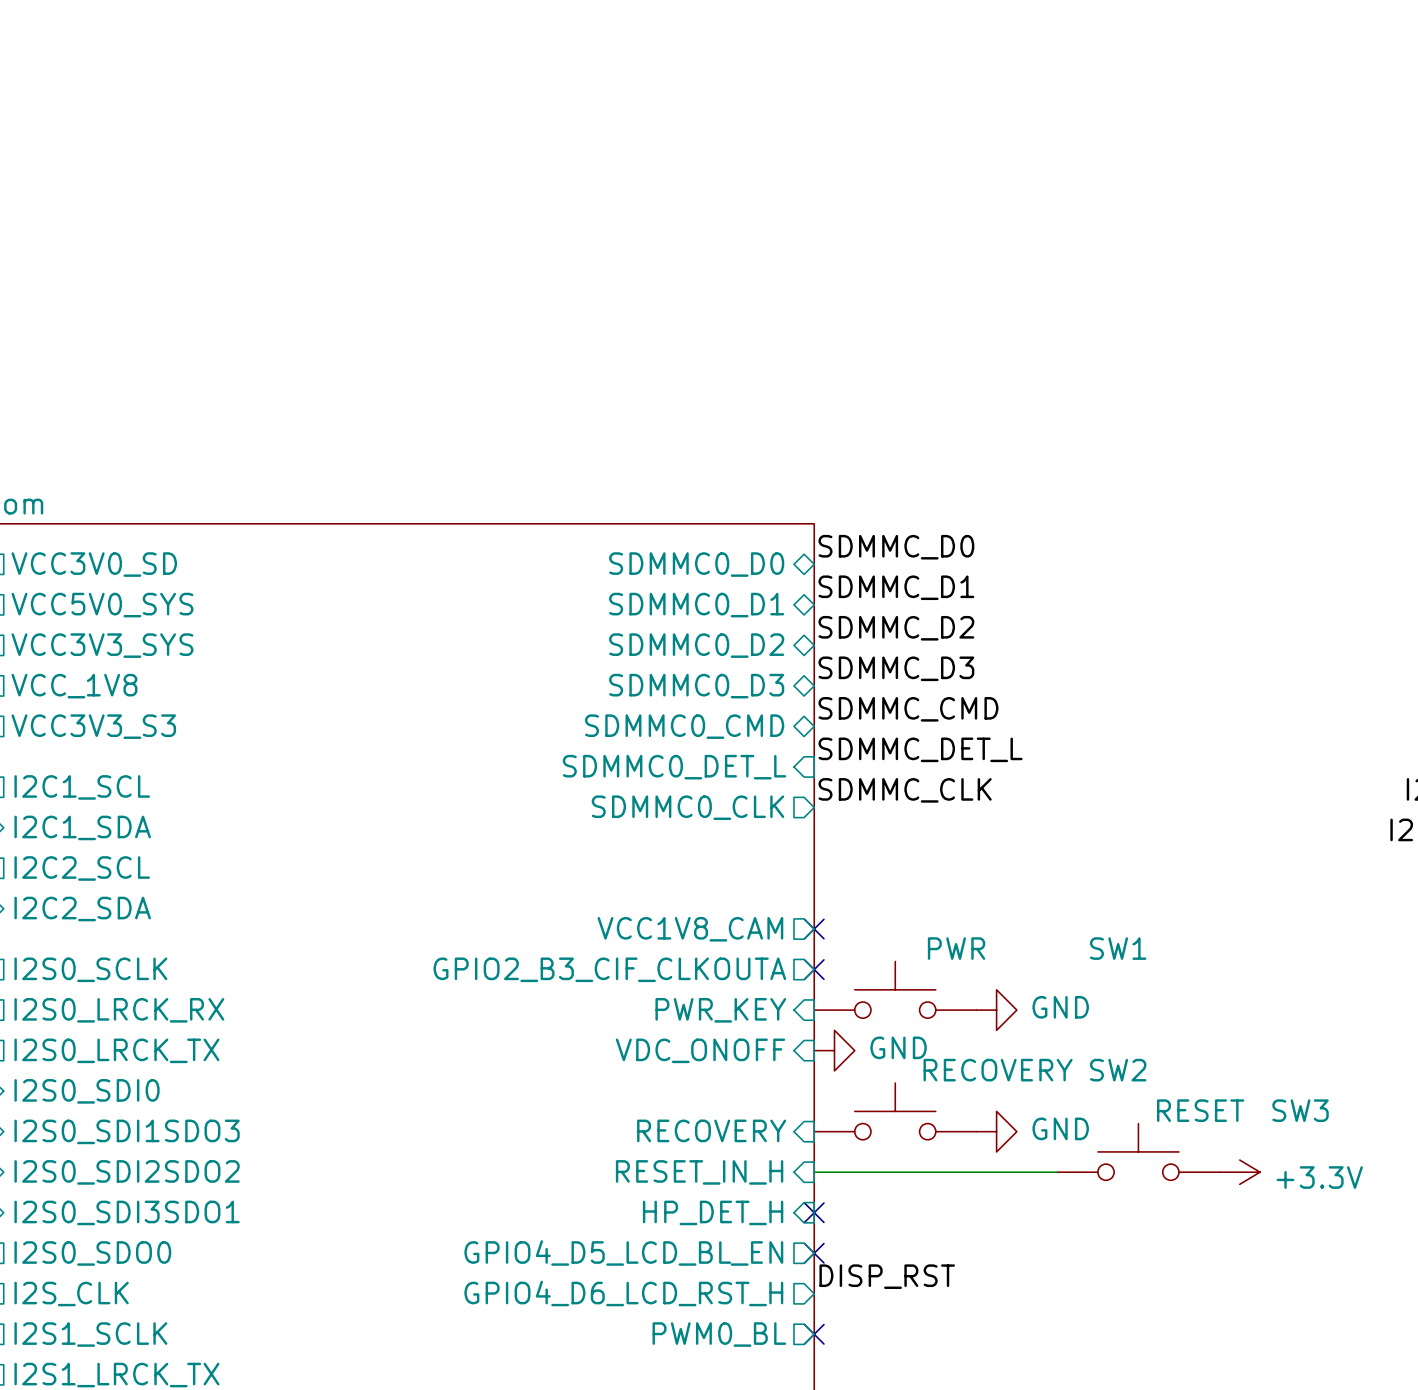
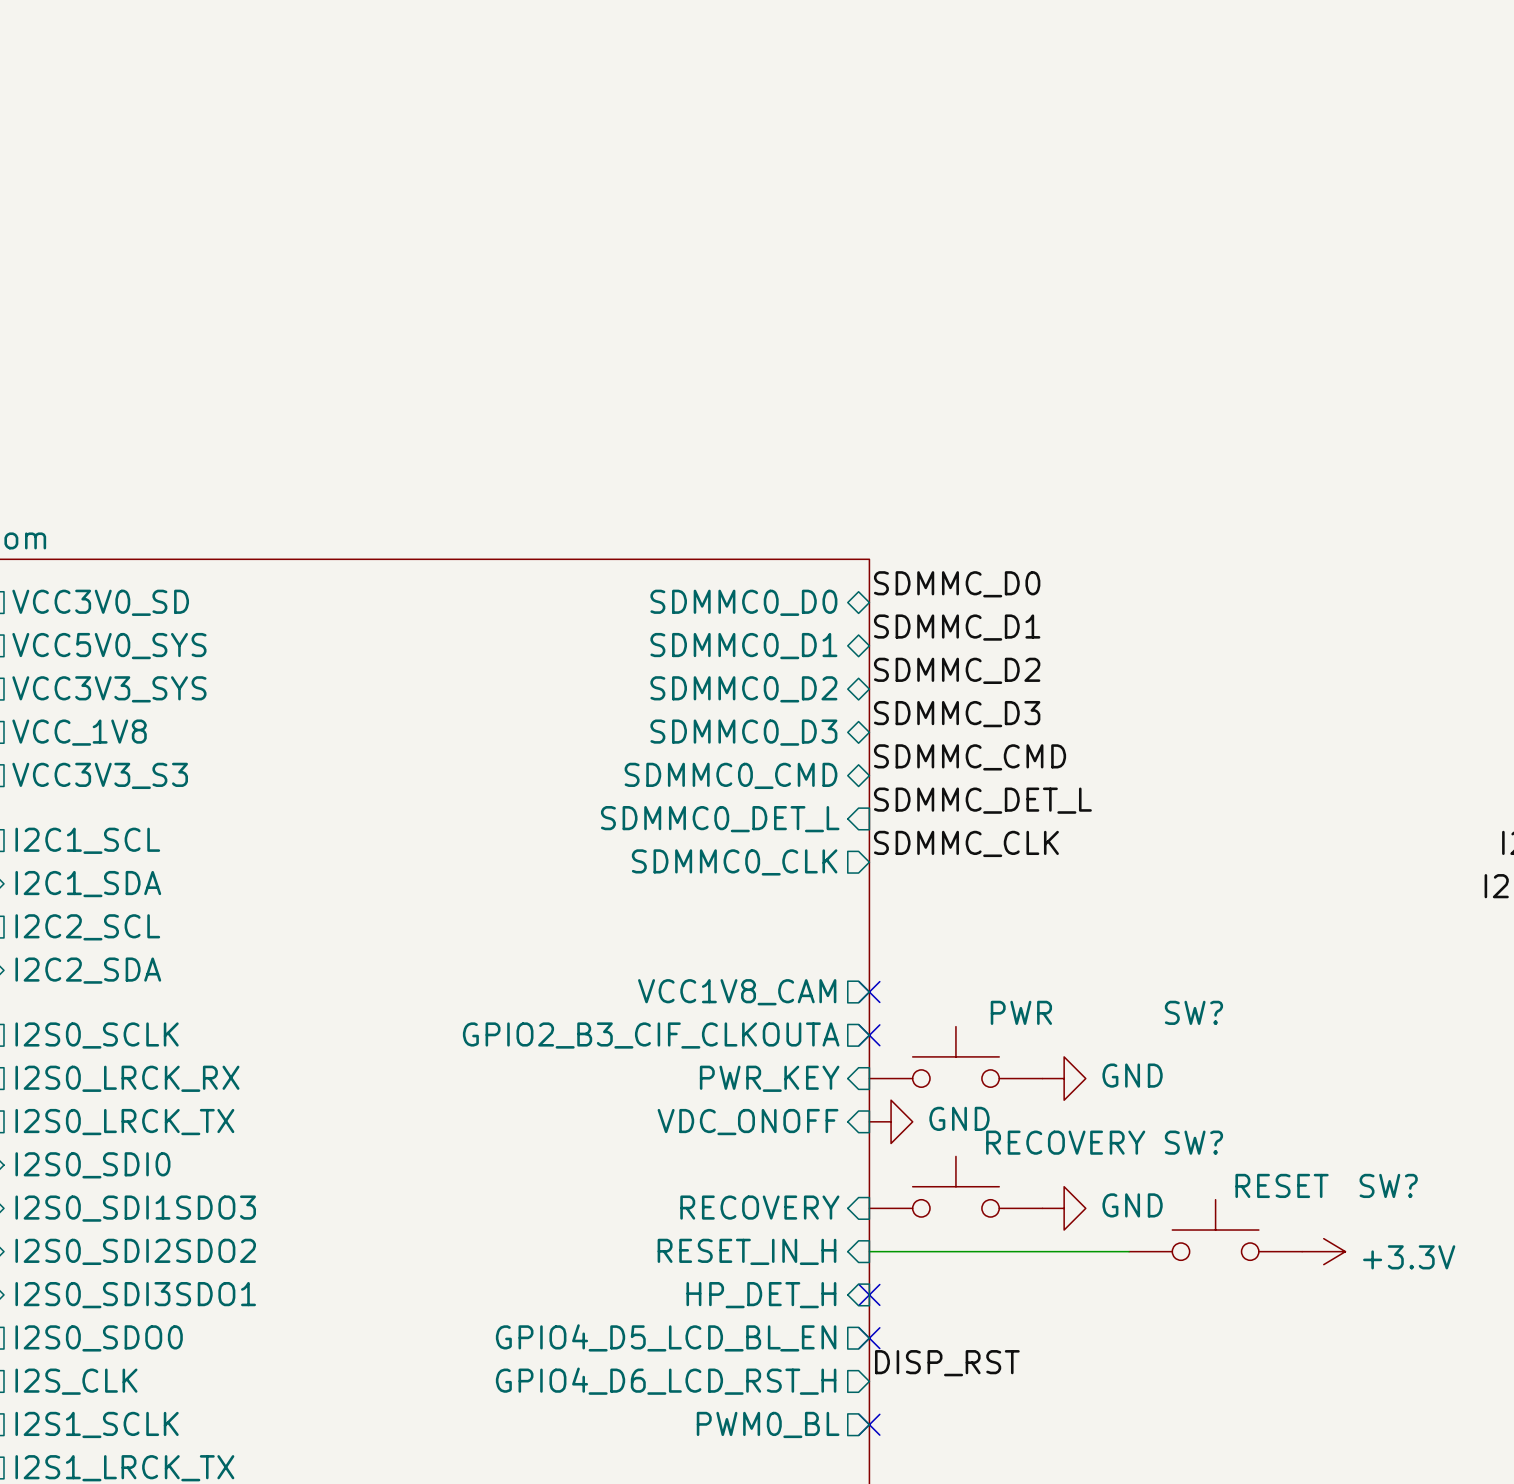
SW1 name: SW1 (1118, 948) -> SW? (1193, 1012)
SW2 name: SW2 (1118, 1070) -> SW? (1193, 1142)
SW3 name: SW3 (1300, 1110) -> SW? (1388, 1185)

